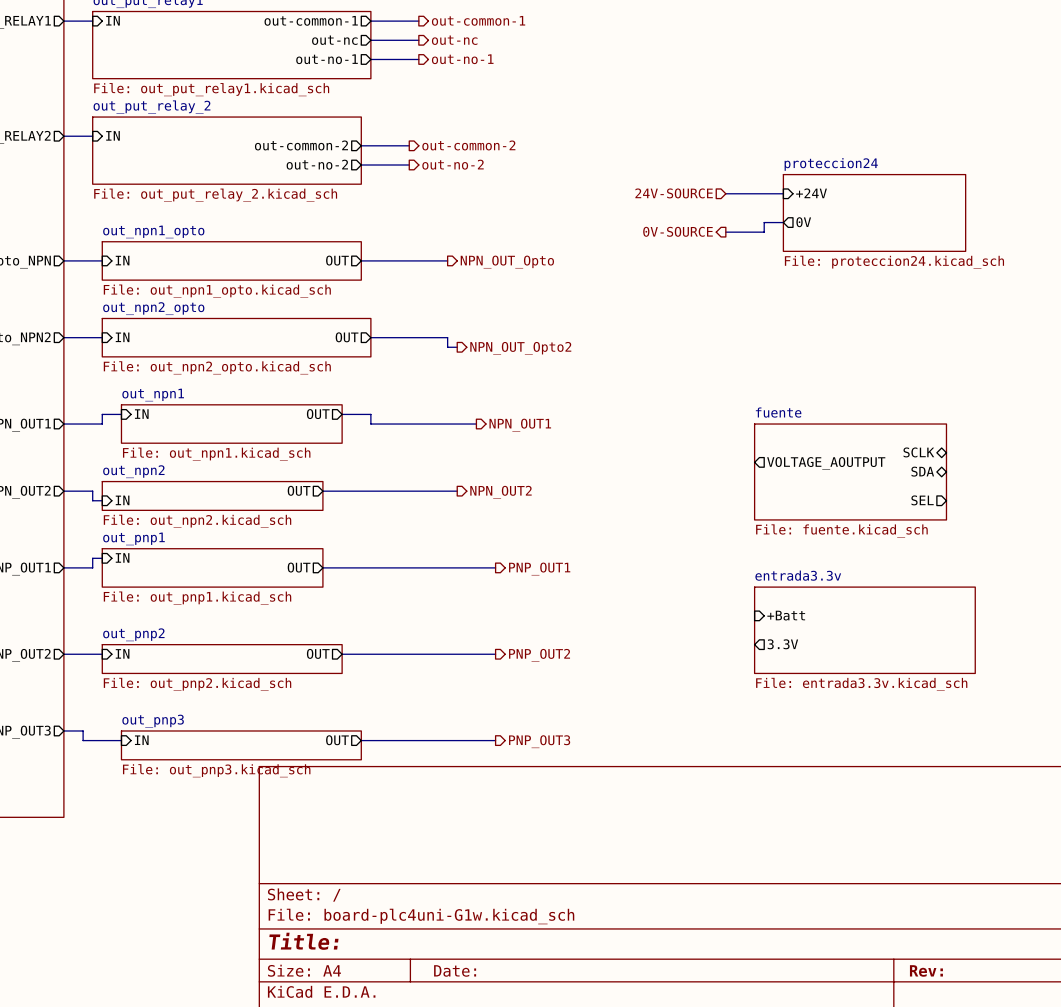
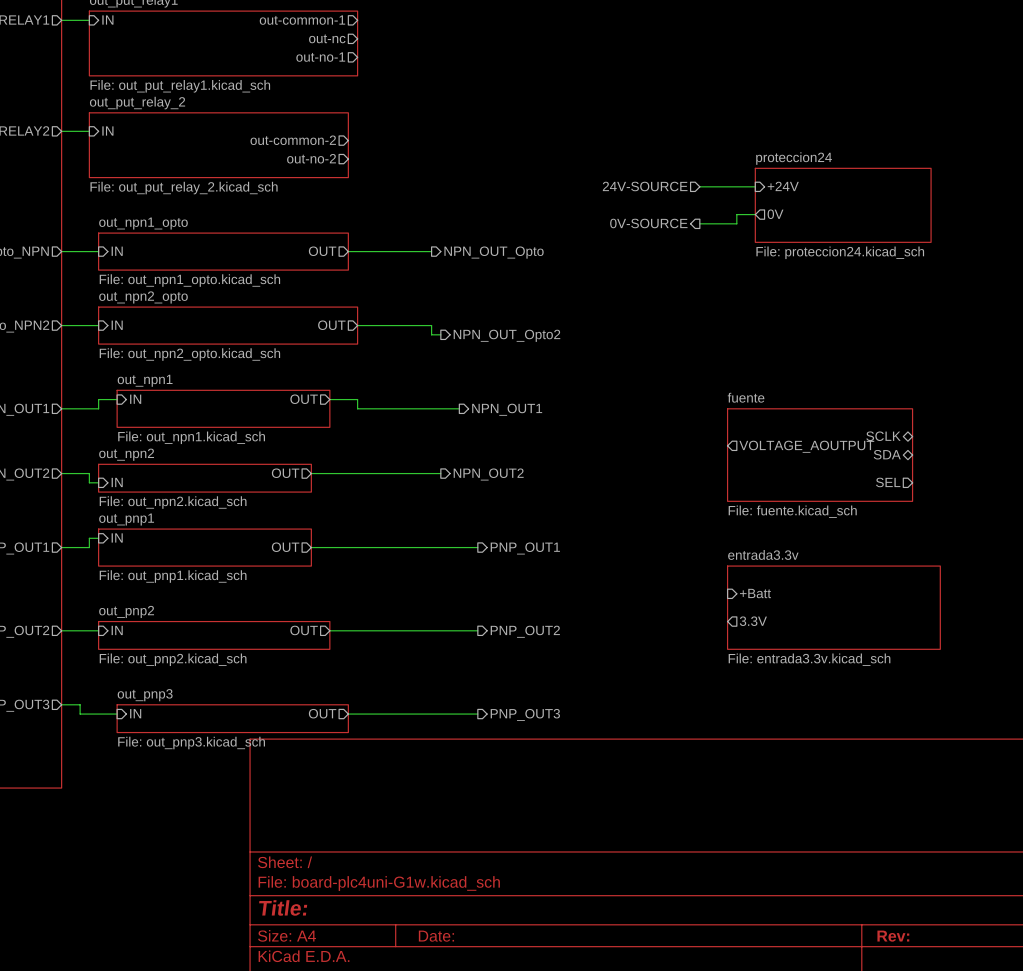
hierarchical label: out-common-1 (478, 20) -> none
wire: (370, 21) (418, 21) -> none
wire: (370, 40) (418, 40) -> none
hierarchical label: out-nc (454, 40) -> none
wire: (370, 59) (418, 59) -> none
hierarchical label: out-no-1 (462, 59) -> none
wire: (361, 145) (409, 145) -> none
hierarchical label: out-common-2 (468, 145) -> none
hierarchical label: out-no-2 (453, 164) -> none
wire: (361, 165) (409, 165) -> none

